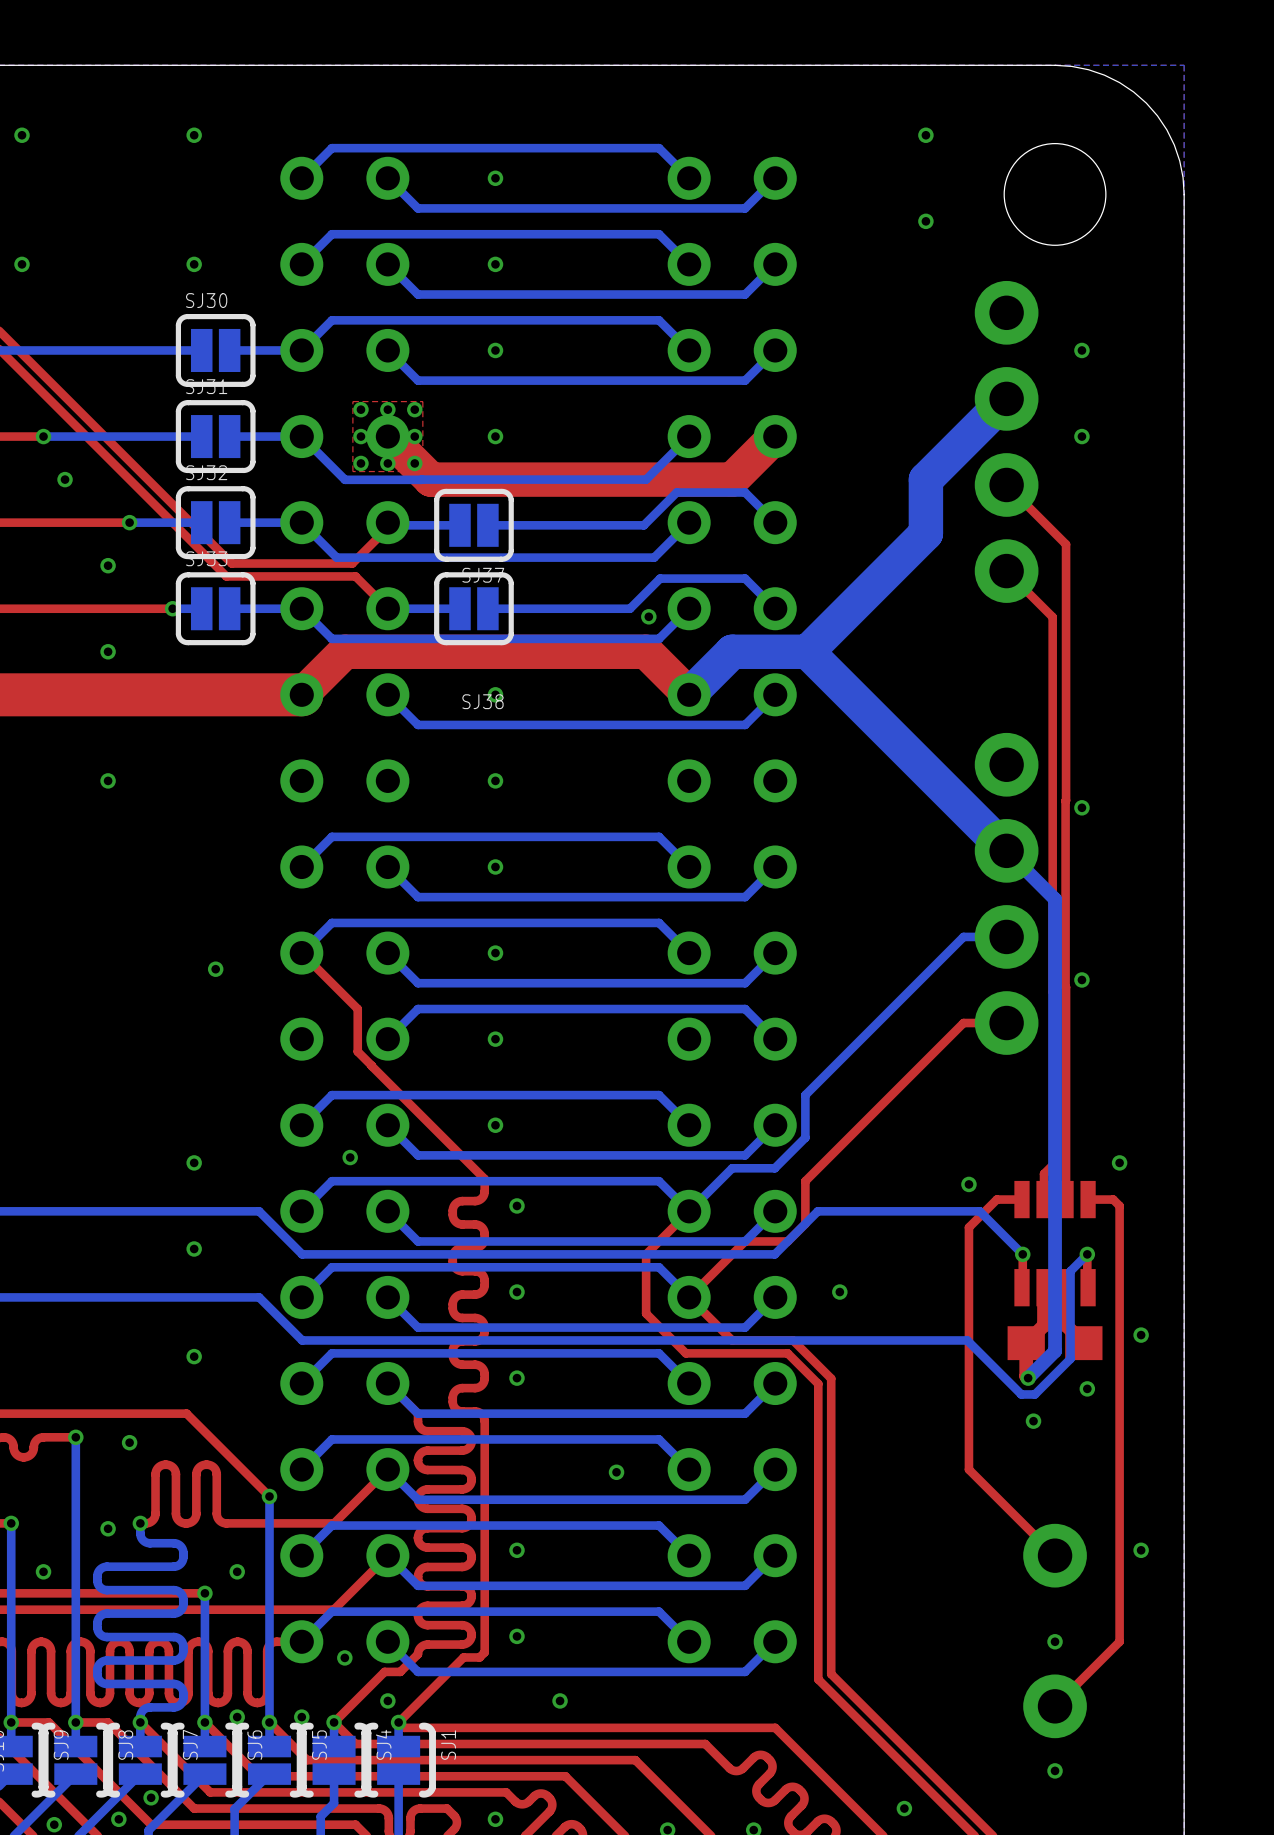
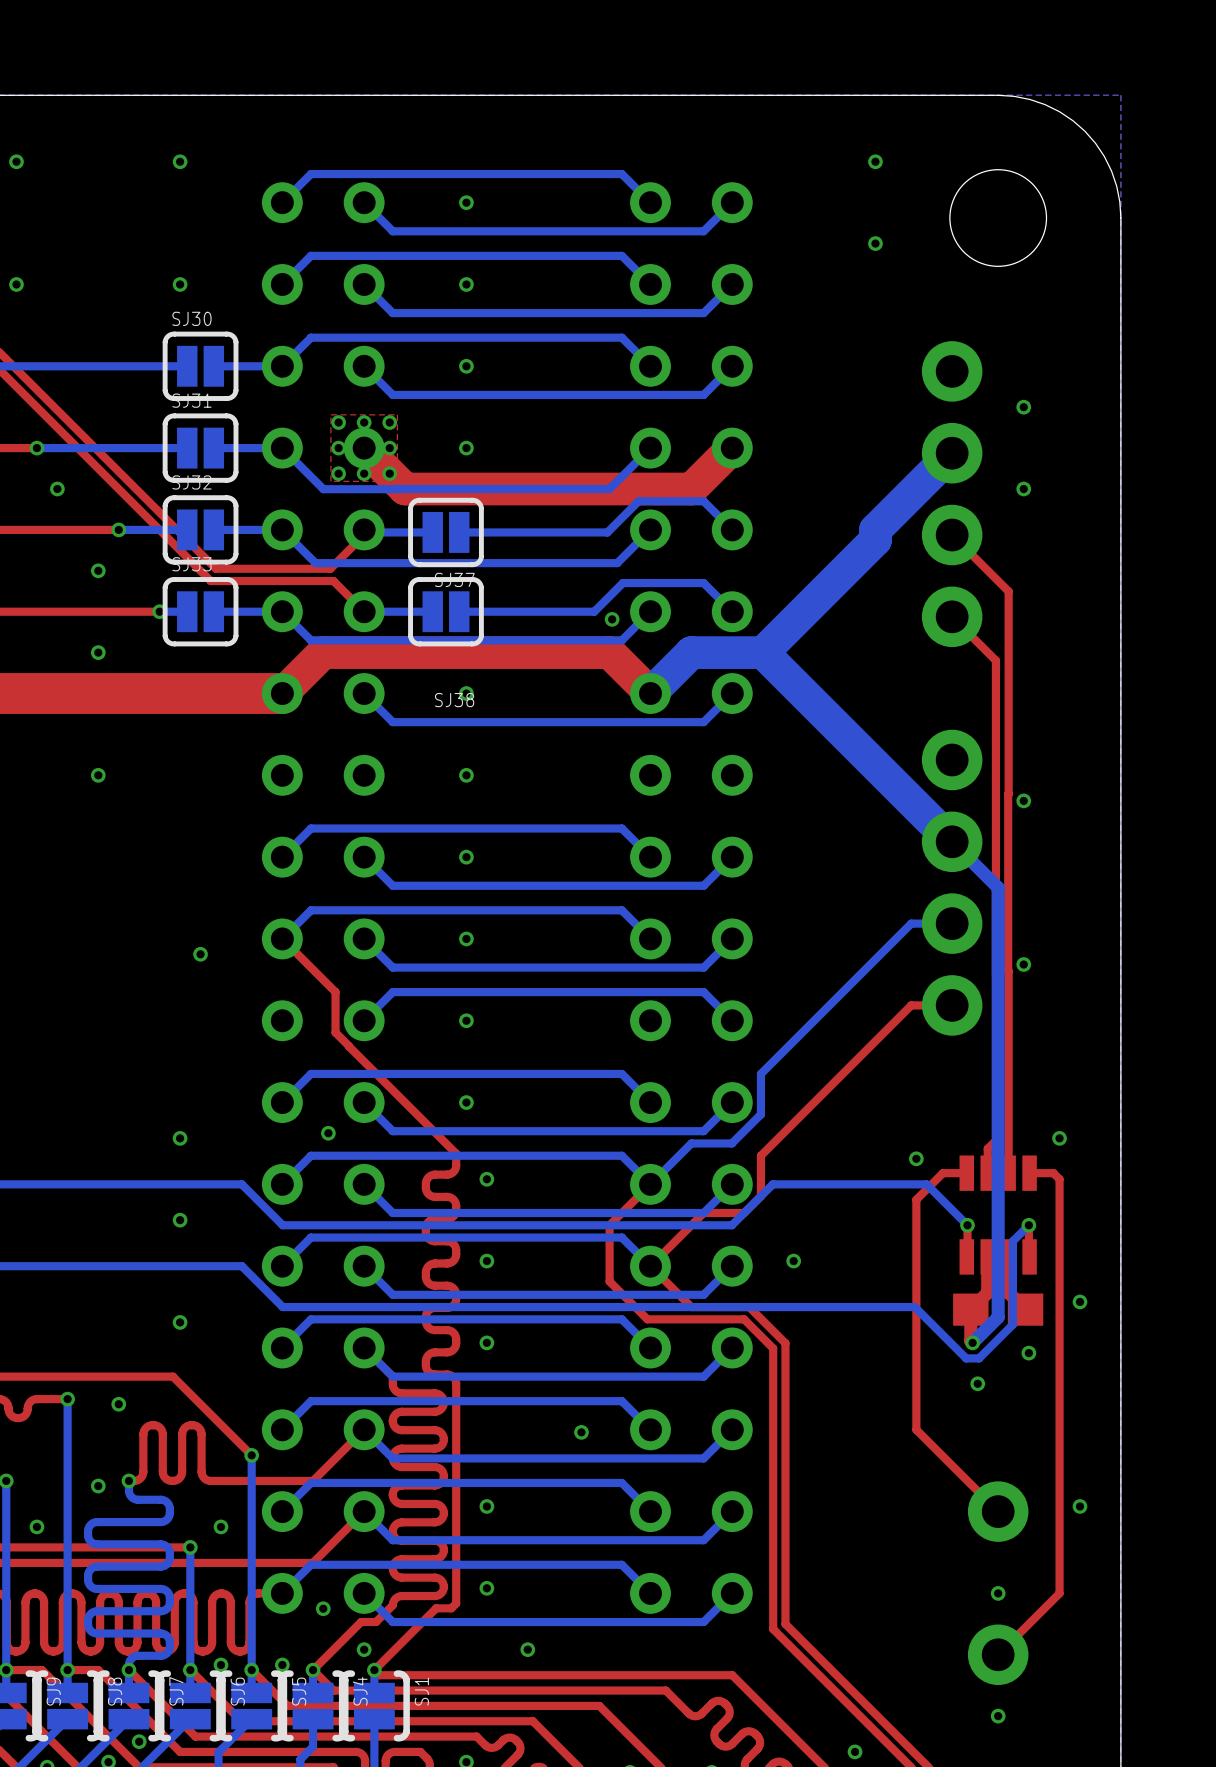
via: (1081, 350) -> none
via: none -> (1023, 407)
bottom track: (1006, 398) (925, 479) (925, 522) -> (952, 453) (875, 529)
via: (1081, 436) -> none
part position: (1006, 441) -> (952, 494)
via: none -> (1023, 489)
top track: (1006, 484) (1066, 544) (1066, 587) -> (952, 535) (1008, 591)
top track: (1006, 571) (1052, 617) (1052, 660) -> (952, 616) (995, 660)

